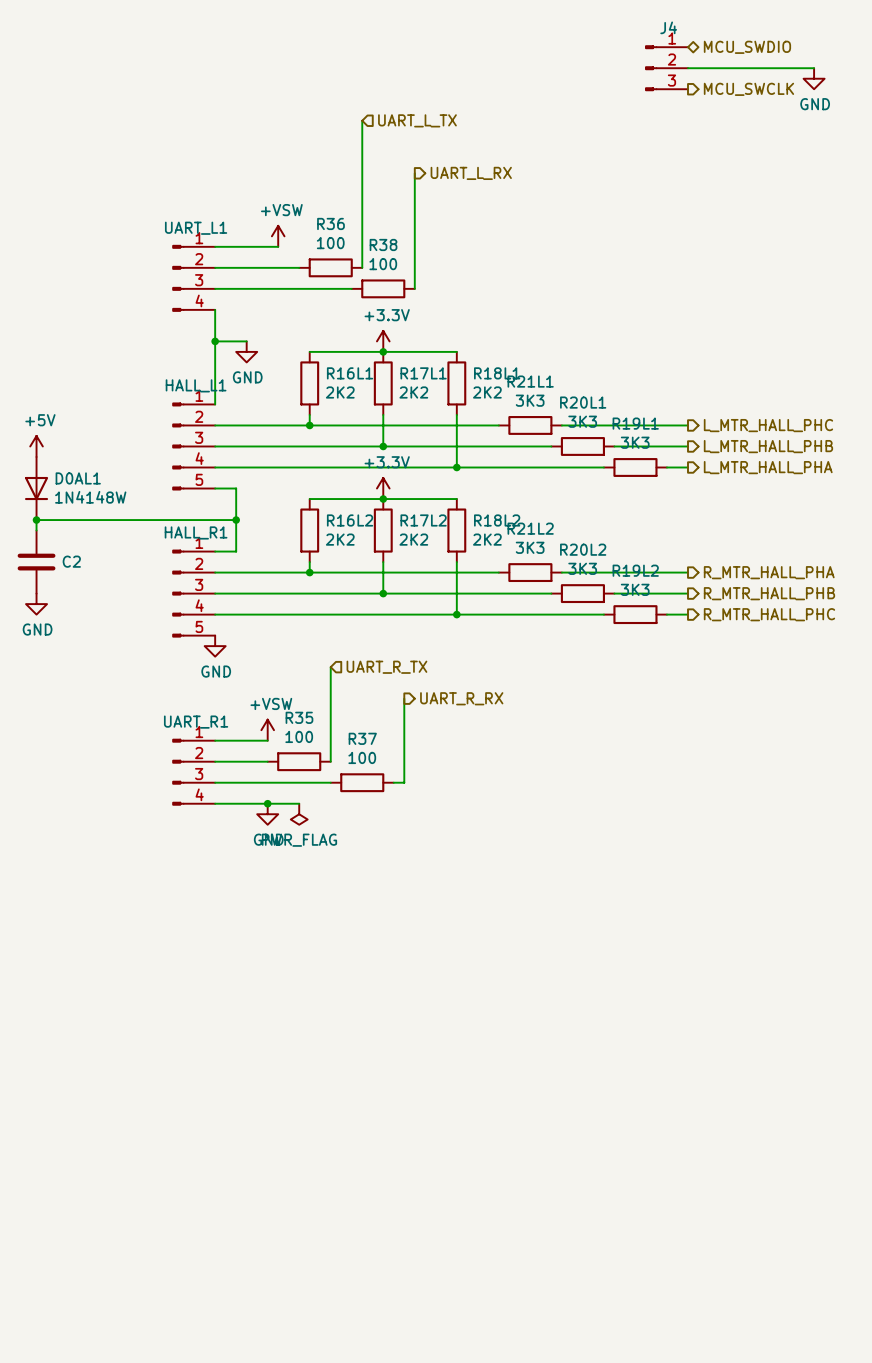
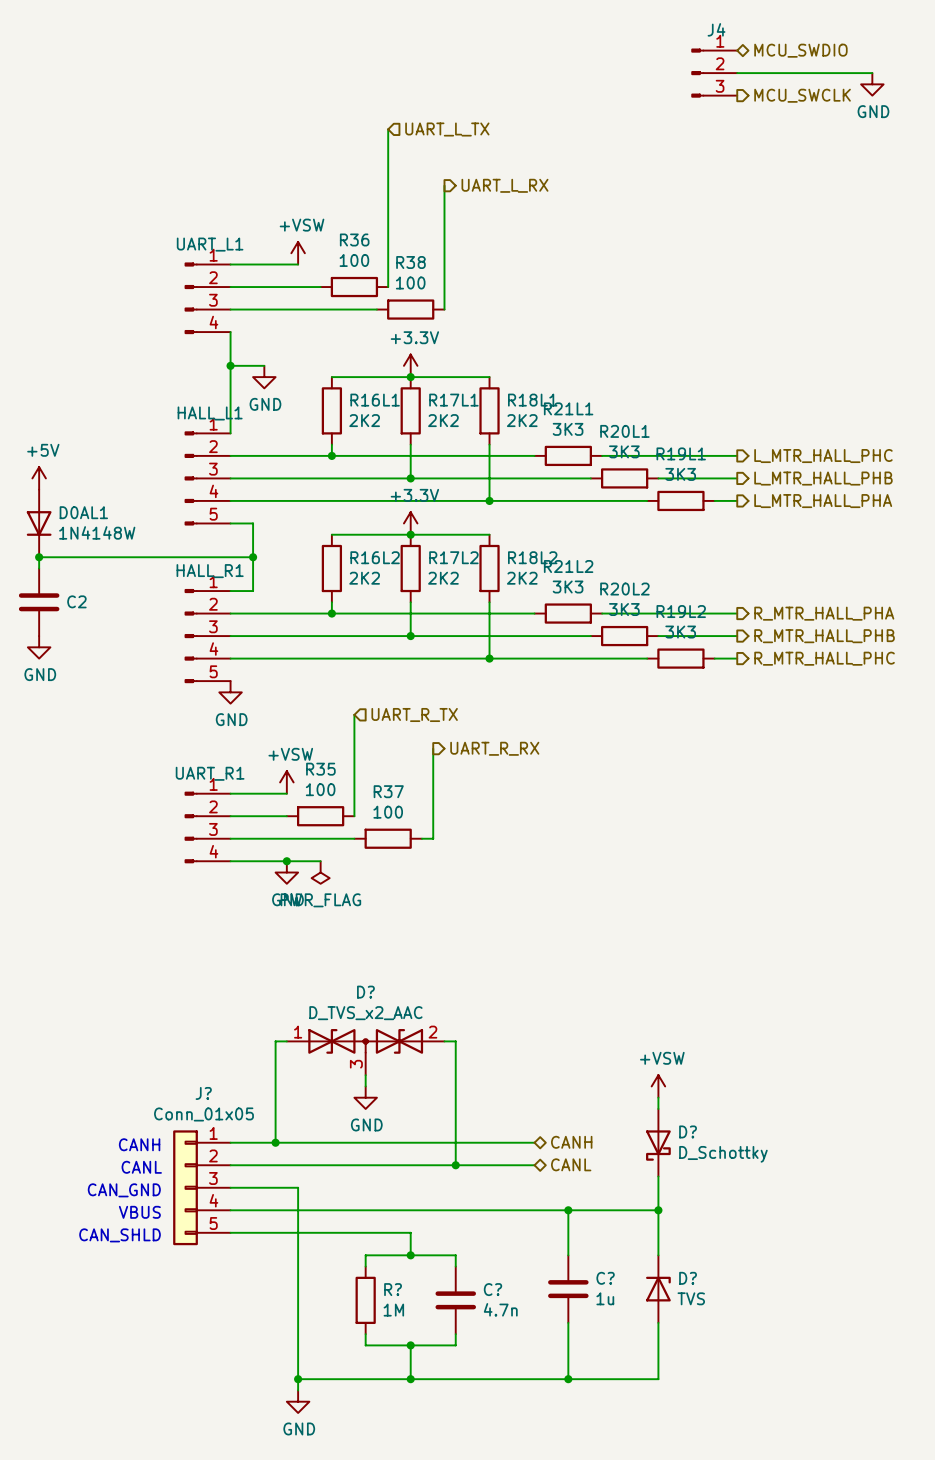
wire: none -> (286, 1041) (275, 1041) (275, 1142)
wire: none -> (444, 1041) (455, 1041) (455, 1165)
D?: none -> D_TVS_x2_AAC (365, 1052)
wire: none -> (365, 1075) (365, 1086)
power symbol: none -> +VSW (658, 1086)
power symbol: none -> GND (365, 1097)
wire: none -> (658, 1097) (658, 1108)
wire: none -> (230, 1142) (534, 1142)
junction: none -> (275, 1142)
hierarchical label: none -> CANH (571, 1142)
D?: none -> D_Schottky (658, 1142)
text: none -> CANH (139, 1144)
wire: none -> (230, 1165) (534, 1165)
junction: none -> (455, 1165)
hierarchical label: none -> CANL (571, 1164)
text: none -> CANL (141, 1167)
wire: none -> (658, 1176) (658, 1255)
J?: none -> Conn_01x05 (201, 1187)
wire: none -> (230, 1187) (298, 1187) (298, 1390)
text: none -> CAN_GND (124, 1190)
wire: none -> (230, 1210) (658, 1210)
wire: none -> (568, 1210) (568, 1255)
junction: none -> (568, 1210)
junction: none -> (658, 1210)
text: none -> VBUS (139, 1212)
wire: none -> (230, 1232) (410, 1232) (410, 1255)
text: none -> CAN_SHLD (120, 1235)
junction: none -> (410, 1255)
wire: none -> (365, 1266) (365, 1255) (455, 1255) (455, 1266)
C?: none -> 1u (568, 1289)
D?: none -> TVS (658, 1289)
R?: none -> 1M (365, 1300)
C?: none -> 4.7n (455, 1300)
wire: none -> (568, 1322) (568, 1379)
wire: none -> (658, 1322) (658, 1379) (298, 1379)
wire: none -> (365, 1334) (365, 1345) (455, 1345) (455, 1334)
wire: none -> (410, 1345) (410, 1379)
junction: none -> (410, 1345)
junction: none -> (298, 1379)
junction: none -> (410, 1379)
junction: none -> (568, 1379)
power symbol: none -> GND (298, 1401)

